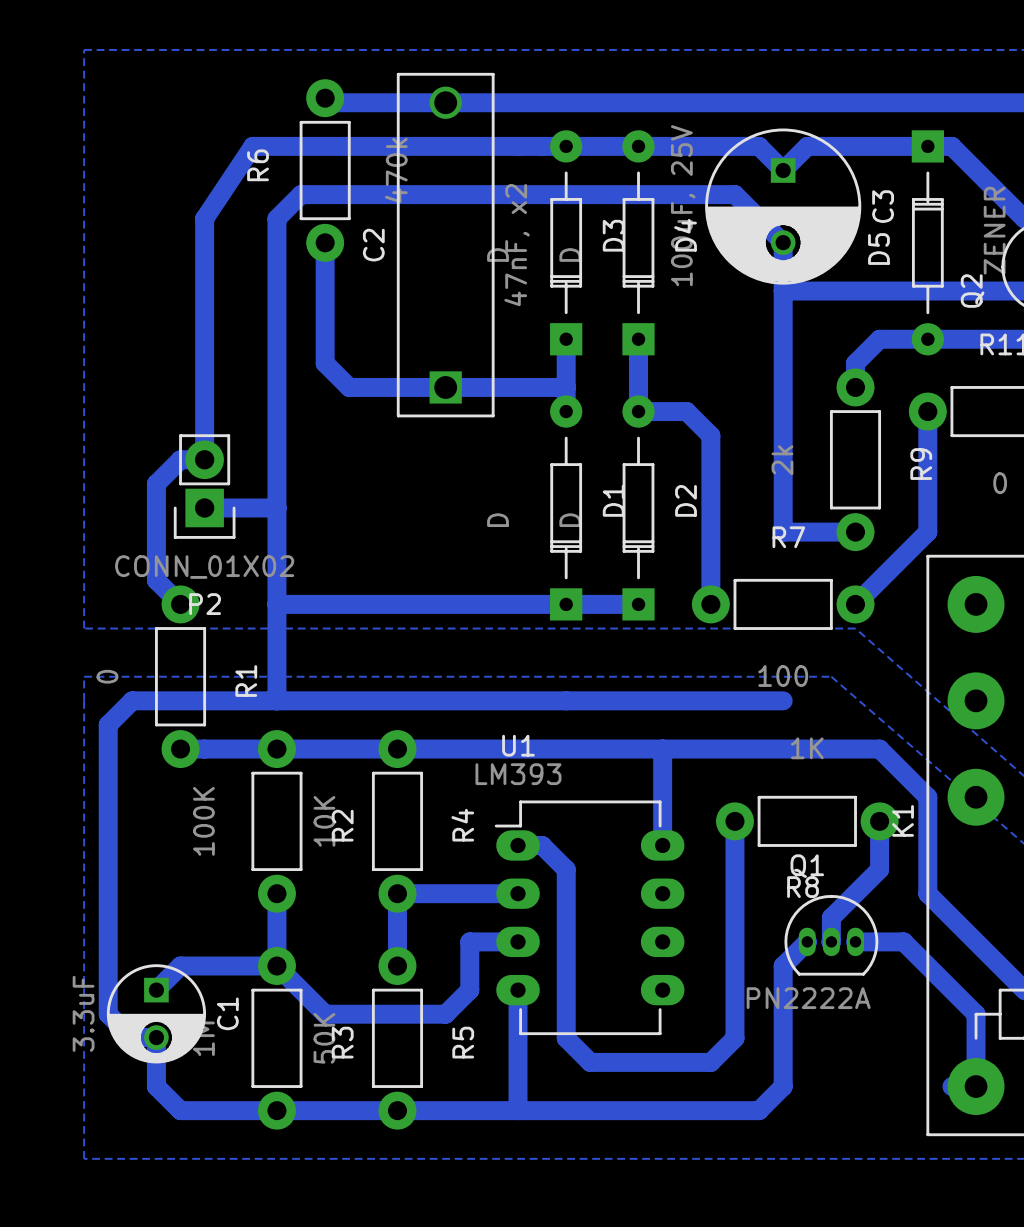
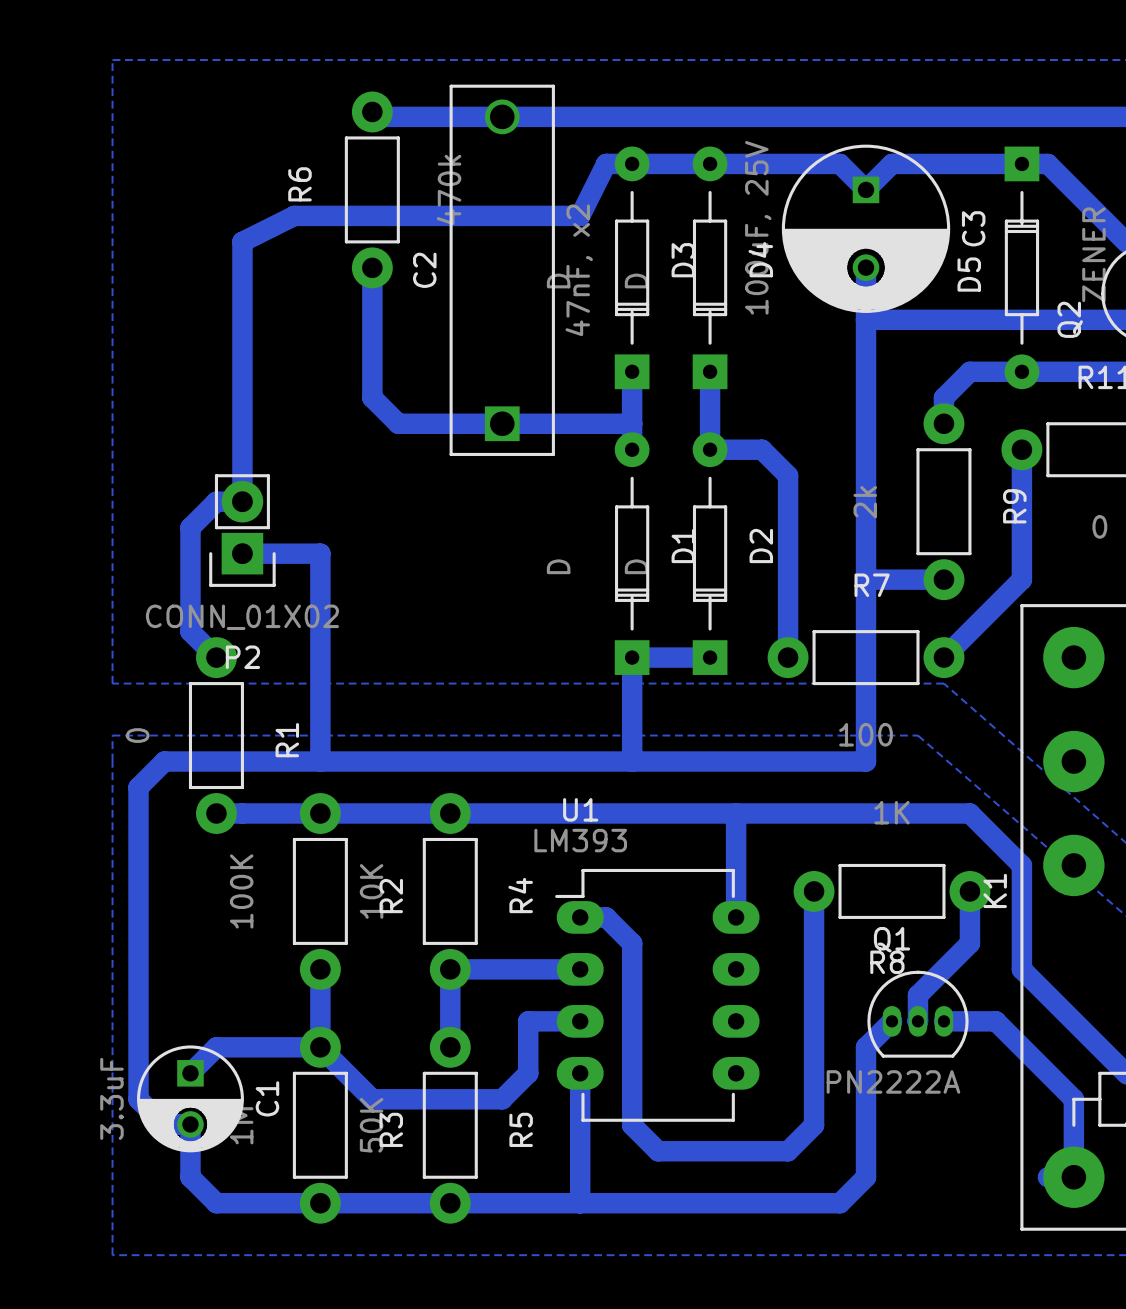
bottom track: (542, 146) (252, 146) (204, 218) -> (346, 215) (294, 215) (242, 241)
bottom track: (301, 194) (276, 218) (276, 507) -> none
bottom track: (518, 194) (734, 194) (783, 242) -> (580, 215) (606, 163)
bottom track: none -> (866, 579) (866, 761)
bottom track: (276, 604) (566, 604) -> (632, 761) (632, 657)

